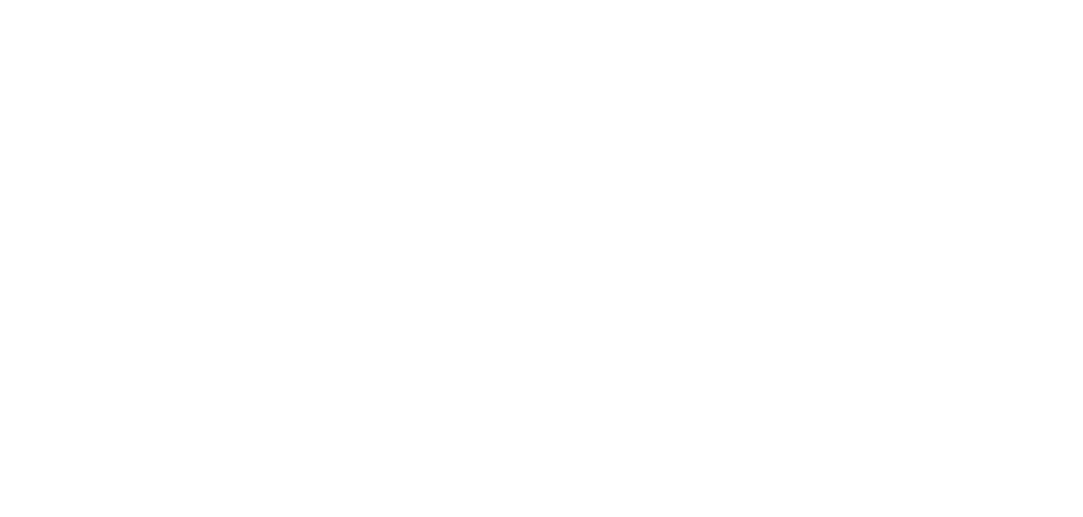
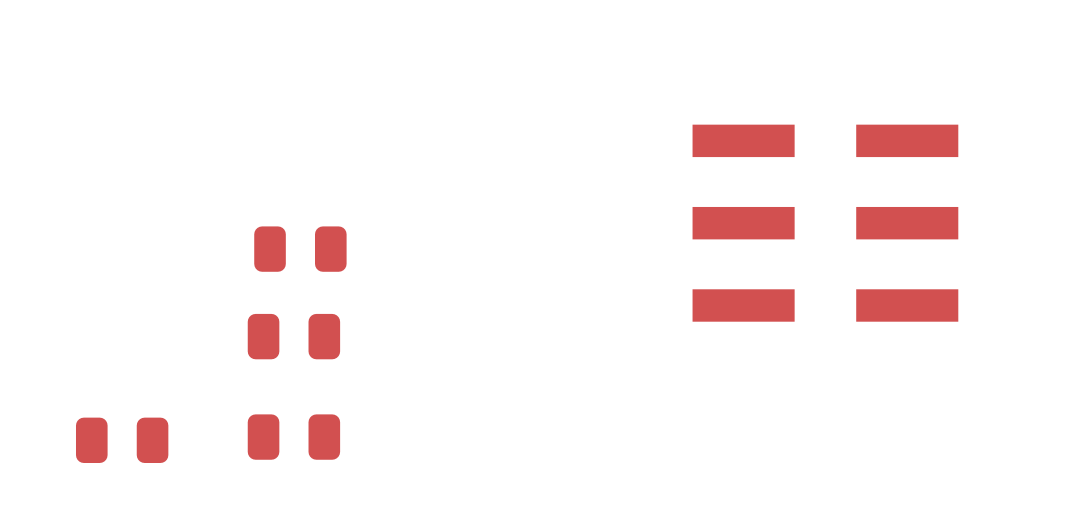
part: none -> (825, 223)
part: none -> (300, 249)
part: none -> (293, 336)
part: none -> (293, 437)
part: none -> (122, 440)

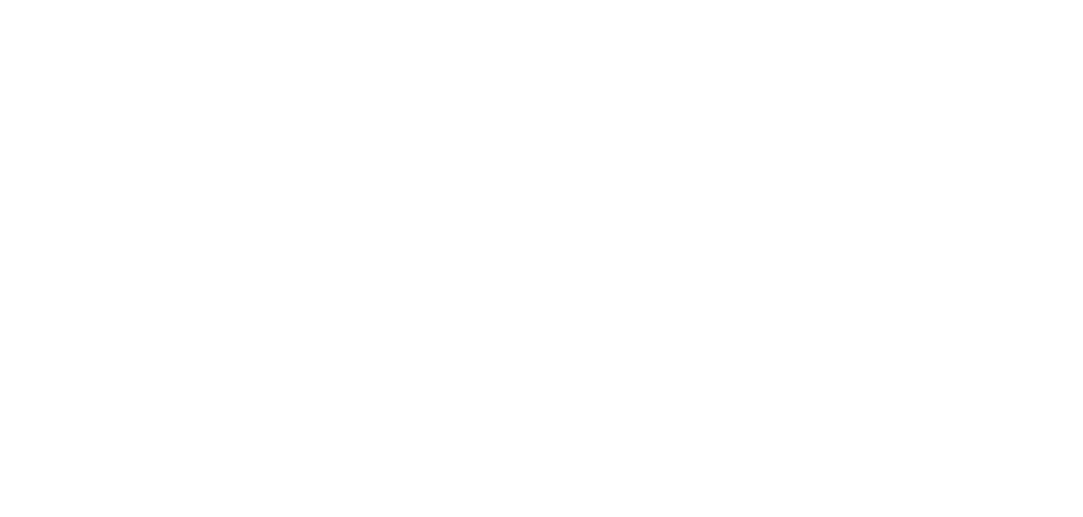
part: (825, 223) -> none
part: (300, 249) -> none
part: (293, 336) -> none
part: (293, 437) -> none
part: (122, 440) -> none

